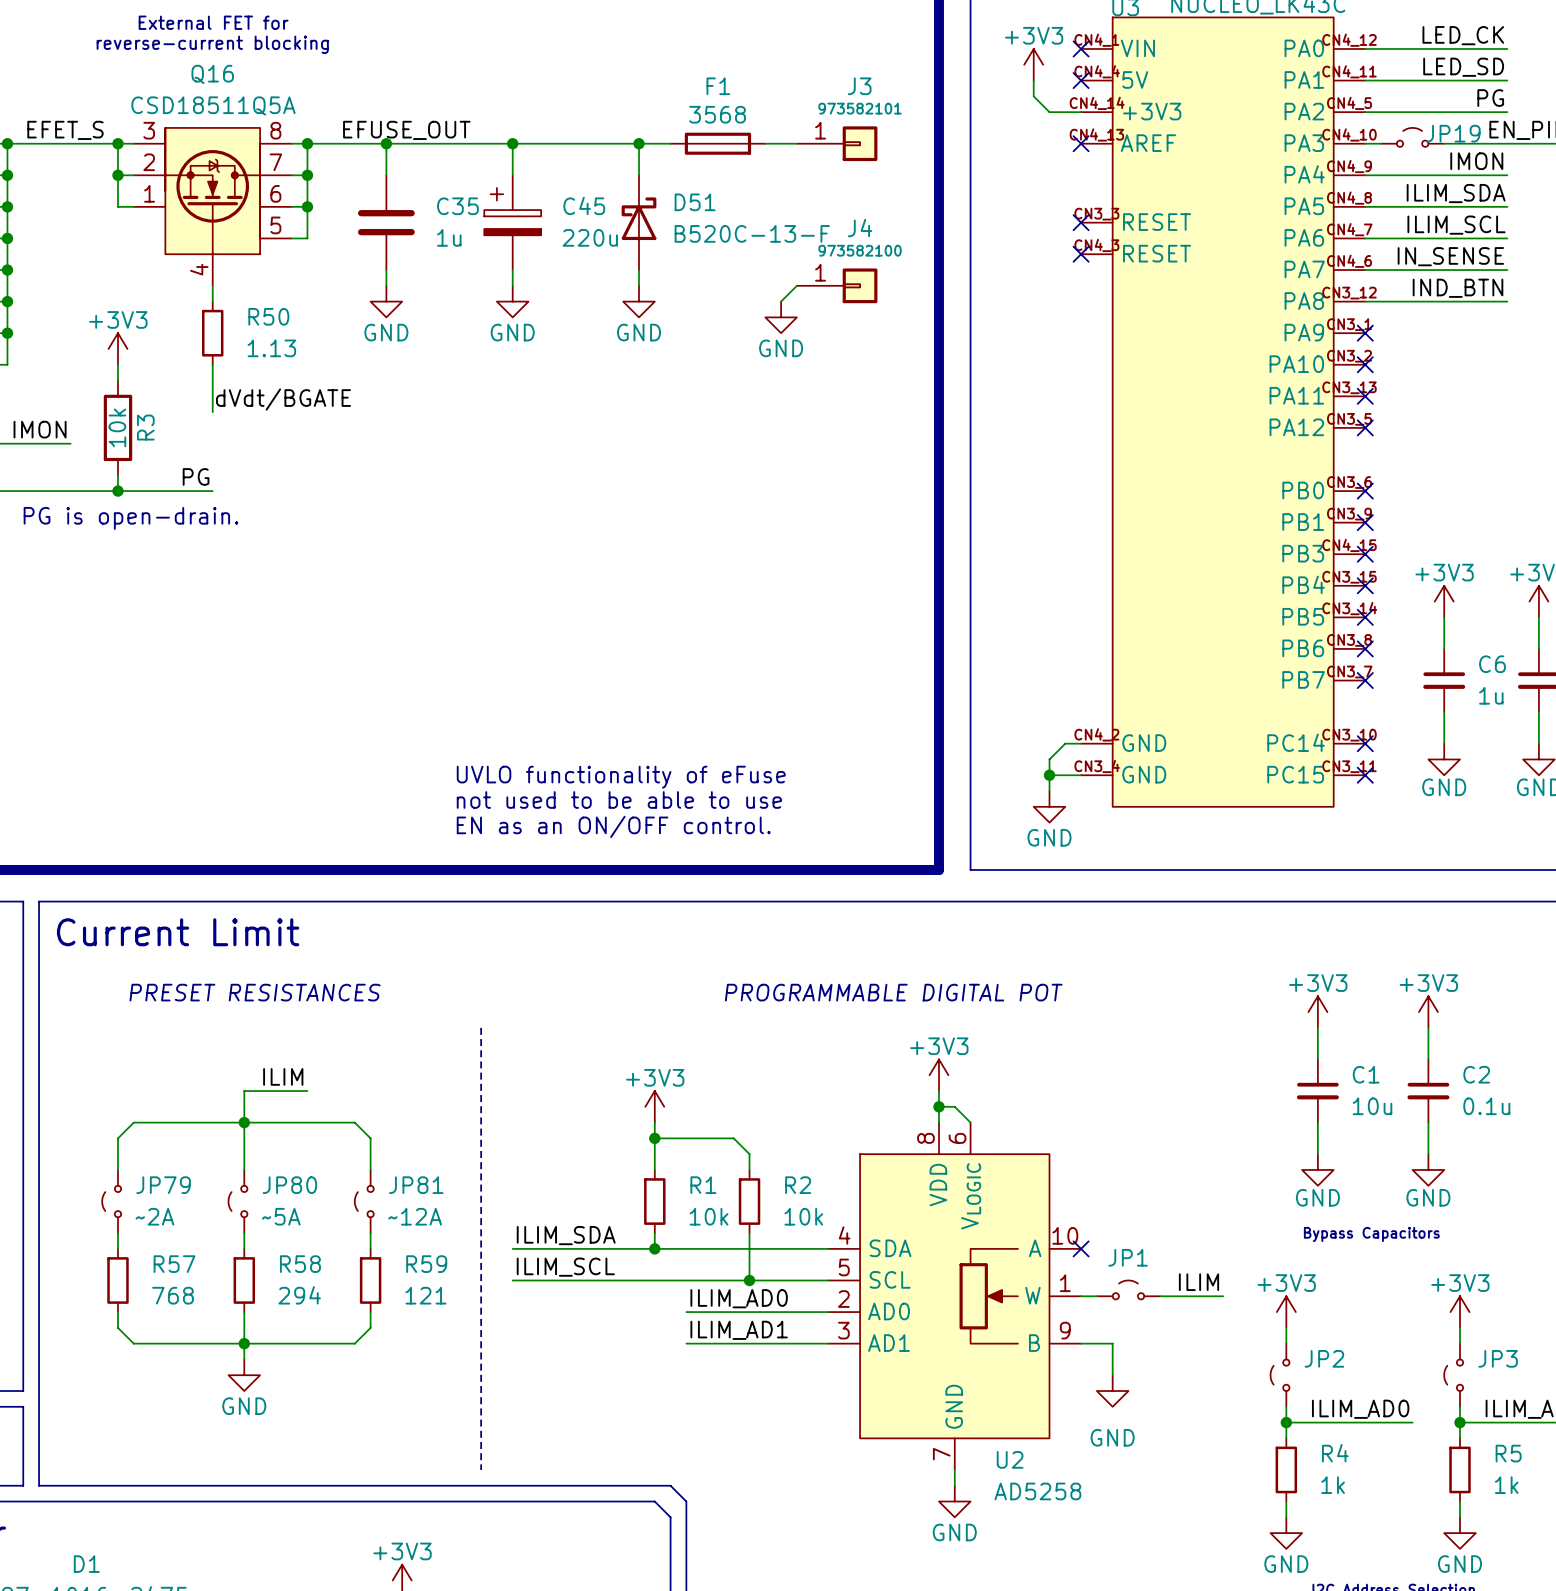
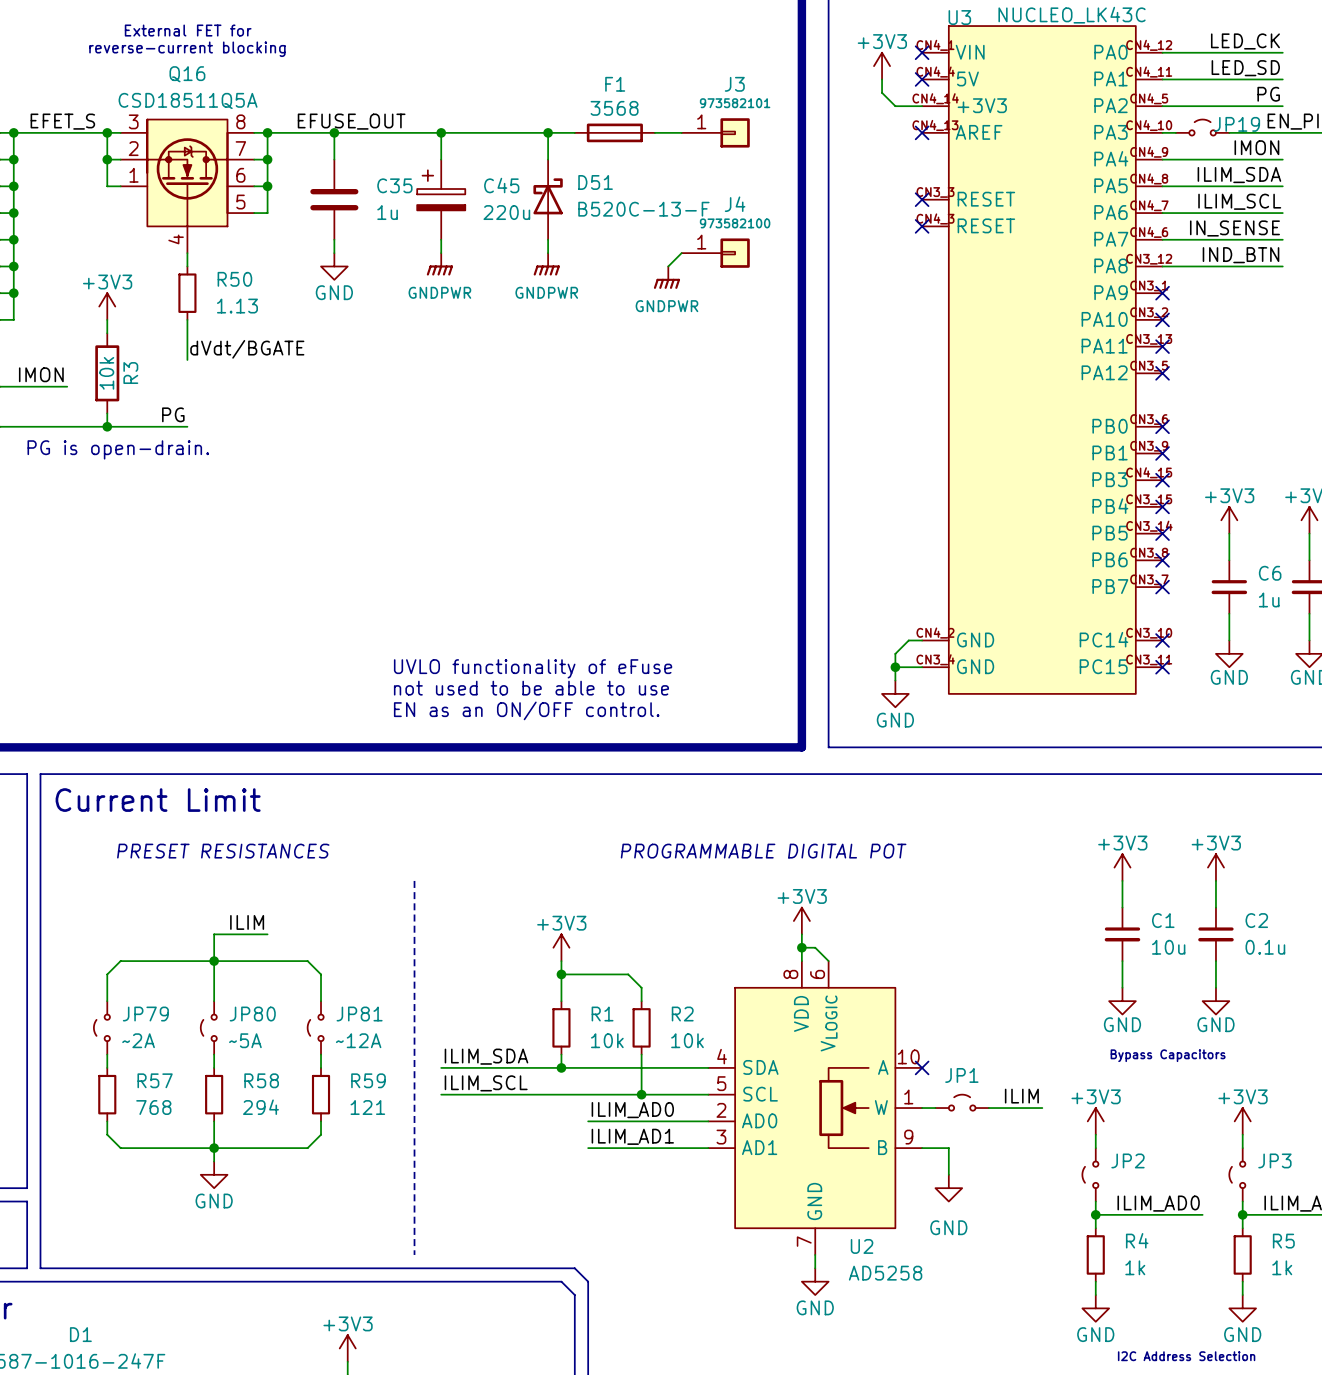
power symbol: GND (512, 301) -> GNDPWR (439, 264)
power symbol: GND (639, 301) -> GNDPWR (546, 264)
power symbol: GND (781, 317) -> GNDPWR (666, 277)

